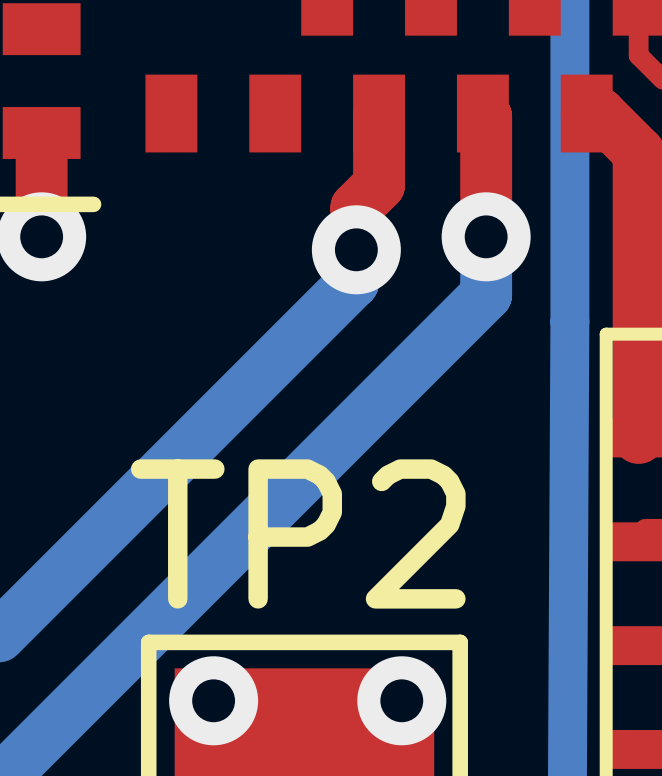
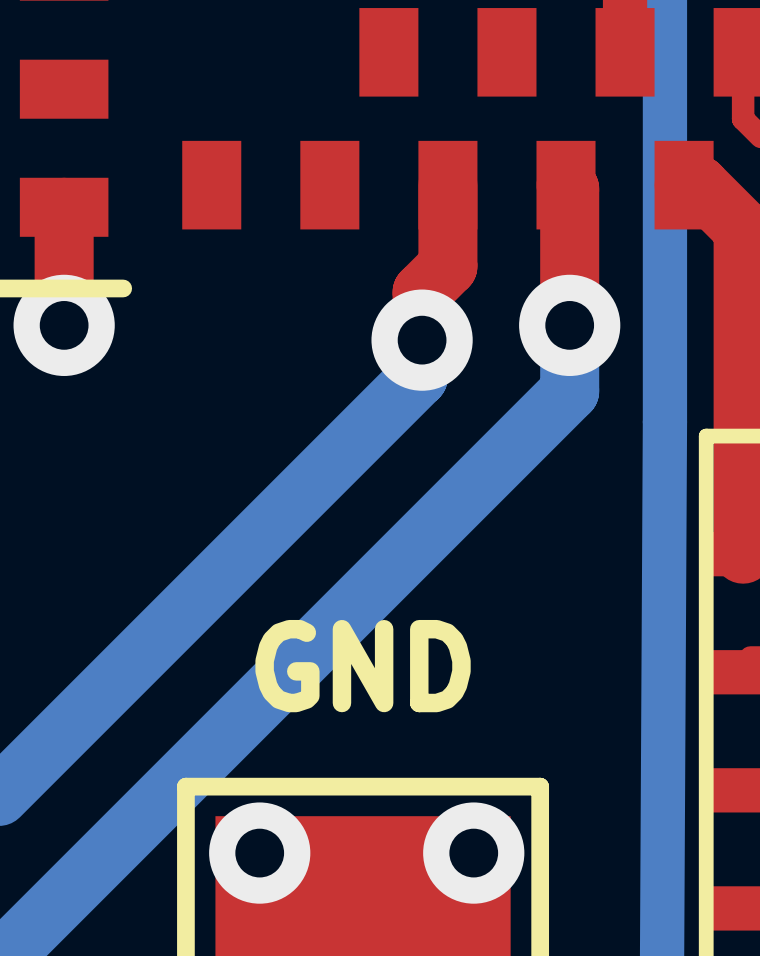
TP2 name: TP2 (298, 533) -> GND (363, 666)

